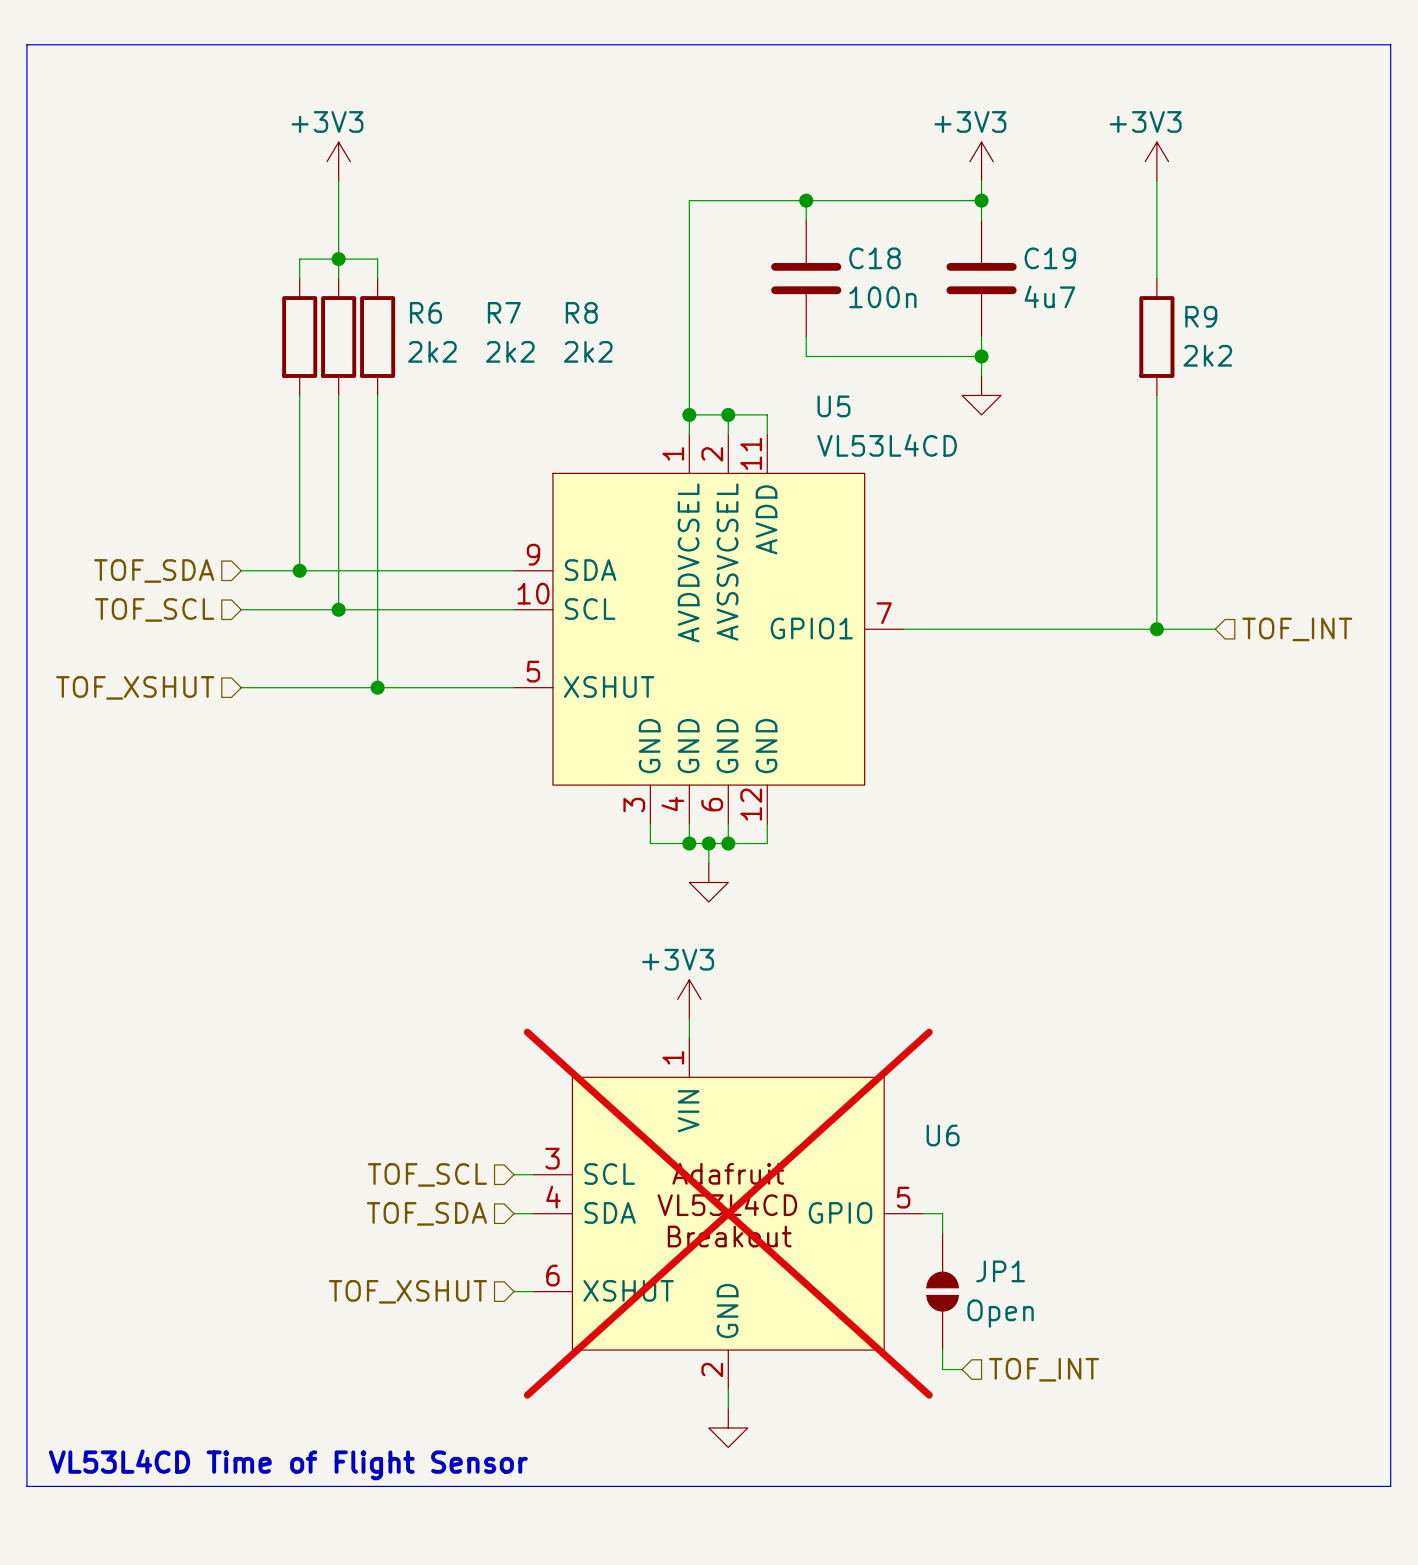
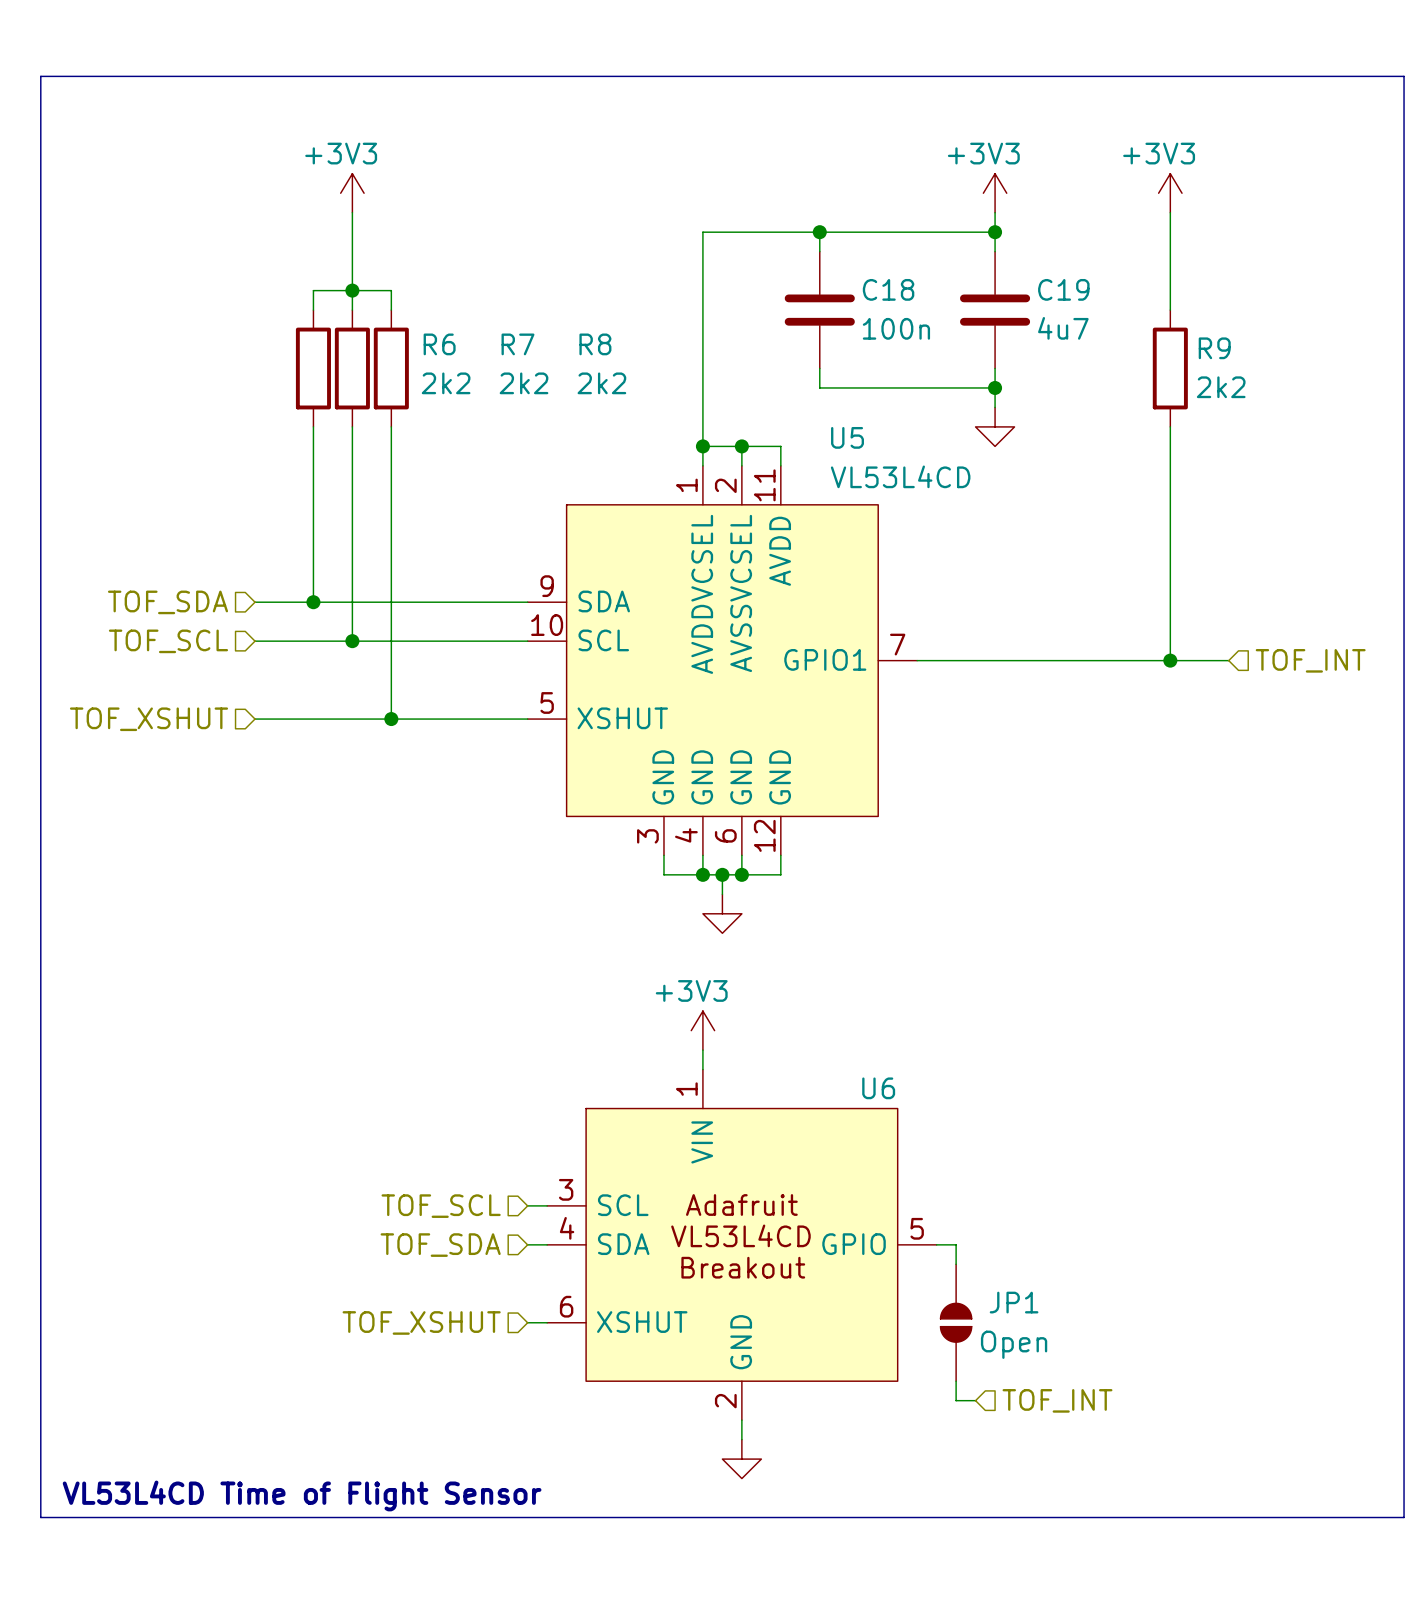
U6 name position: U6 (943, 1135) -> U6 (878, 1088)
U6 do-not-place cross: (728, 1213) -> none

